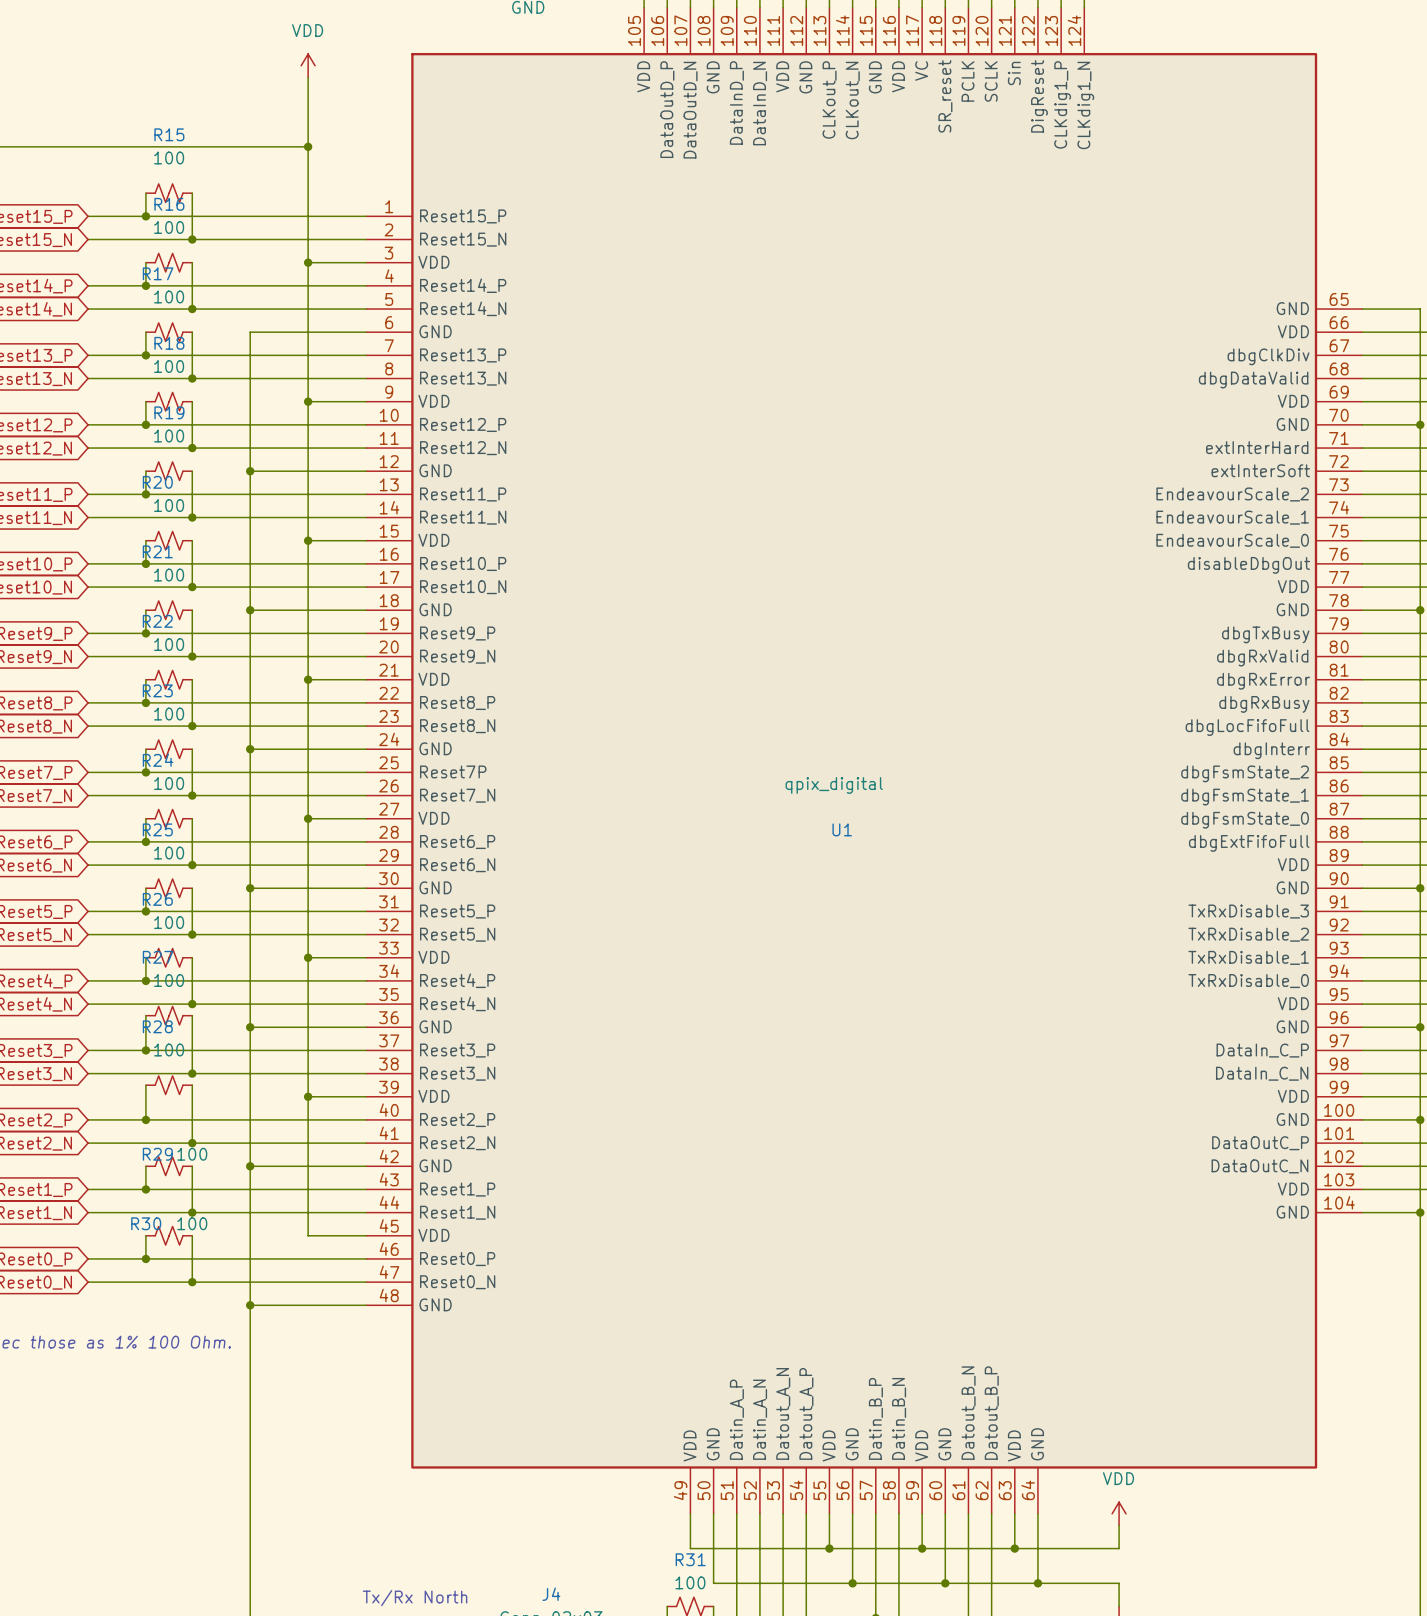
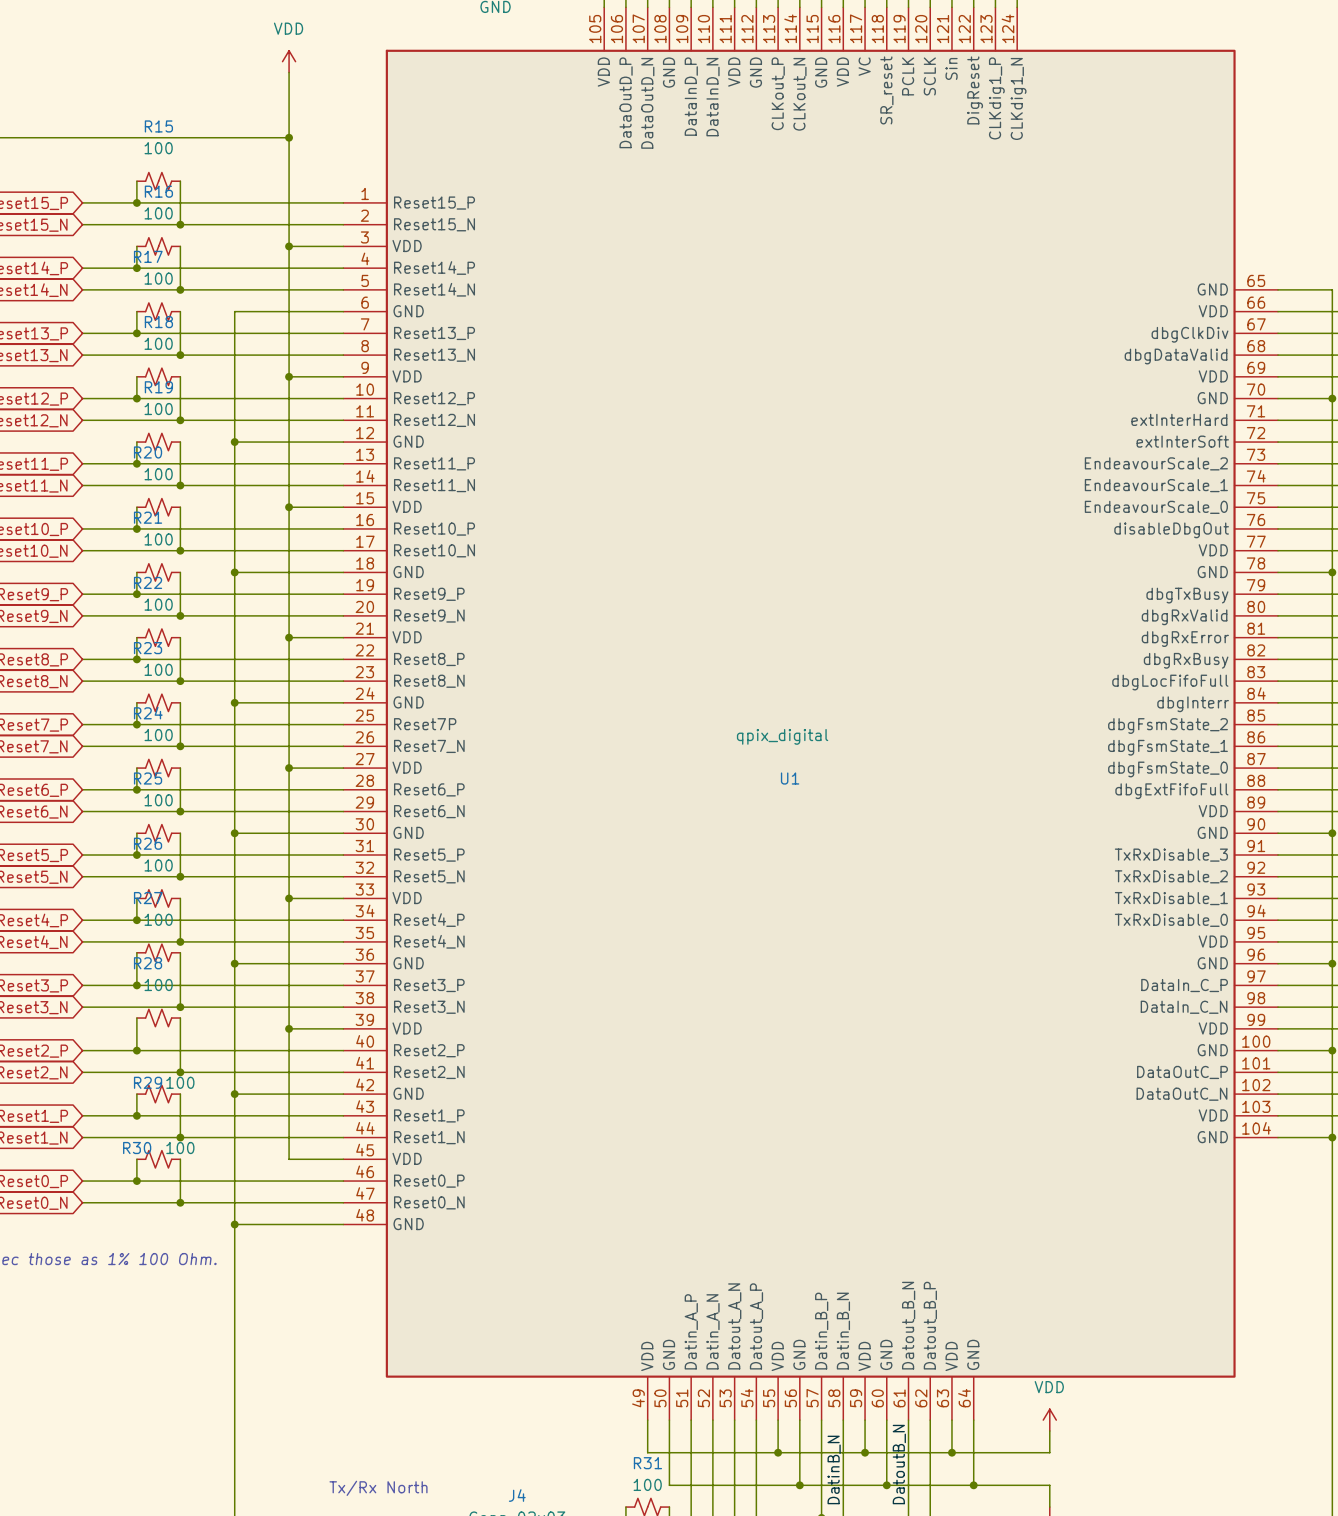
label: none -> DatoutB_N (899, 1464)
label: none -> DatinB_N (834, 1469)
text position: Tx/Rx North (415, 1598) -> Tx/Rx North (378, 1488)

